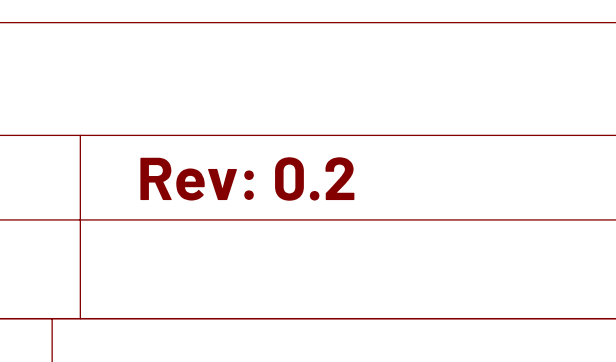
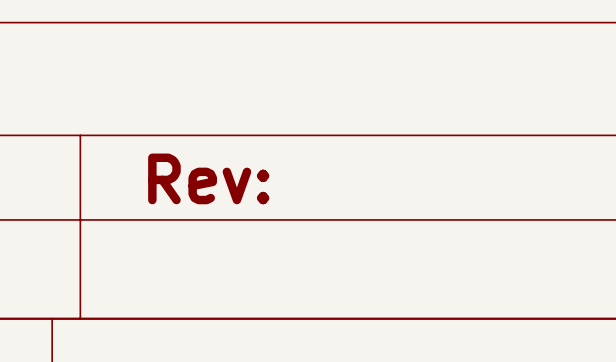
title block: Rev: 0.2 (247, 179) -> Rev: (208, 178)

